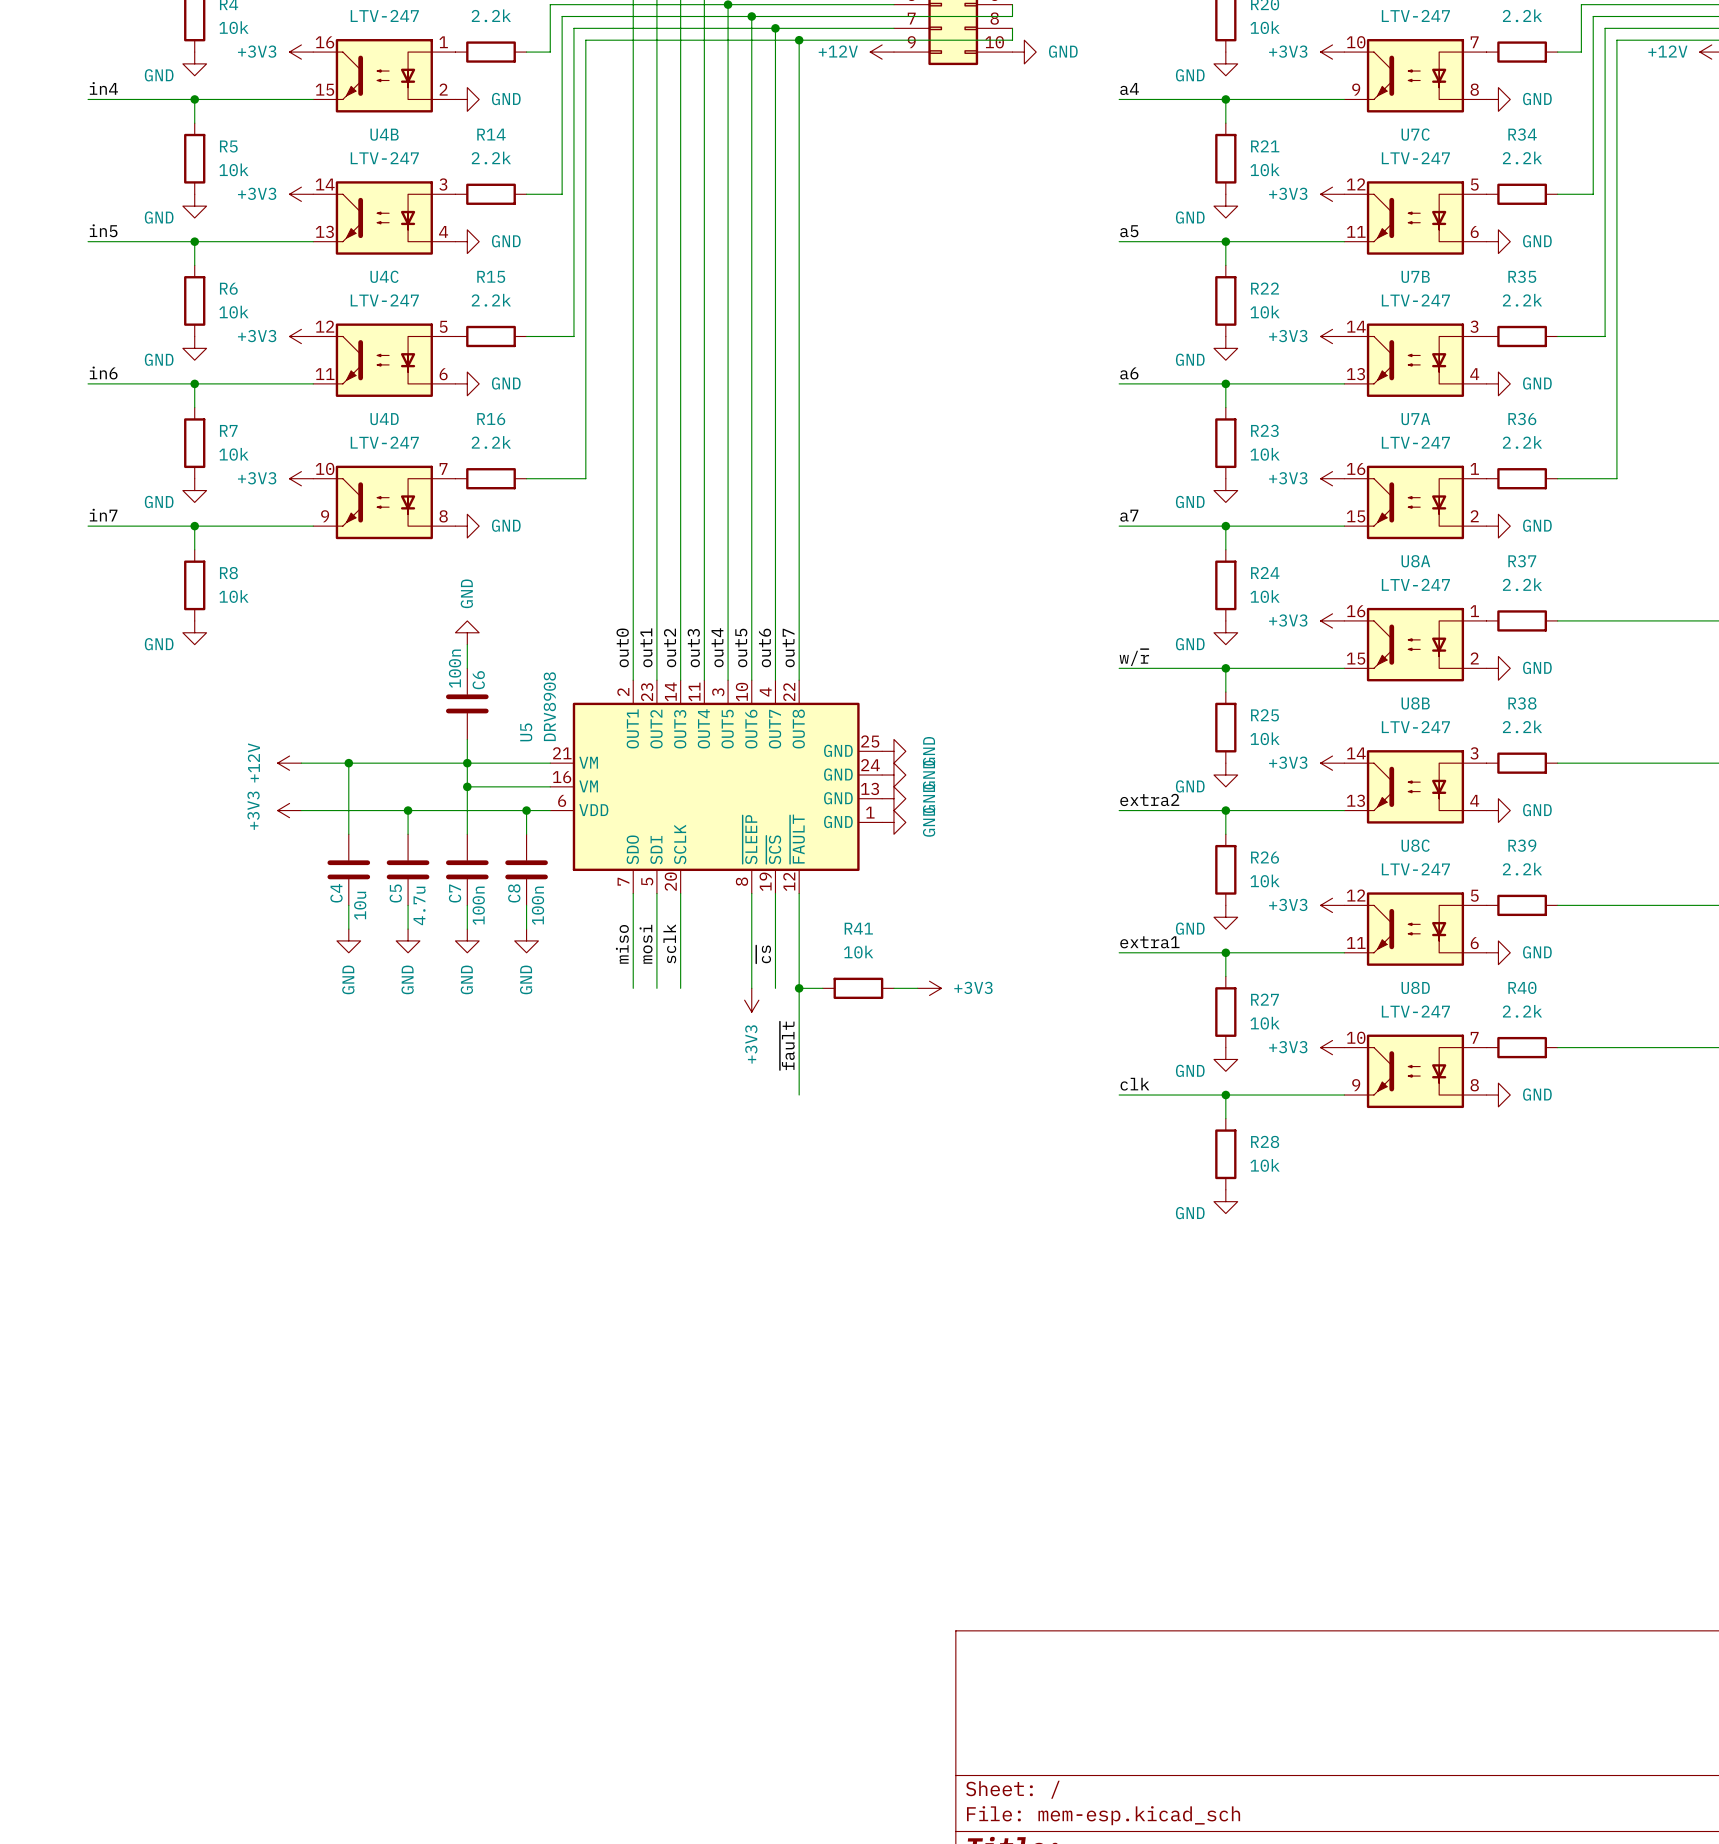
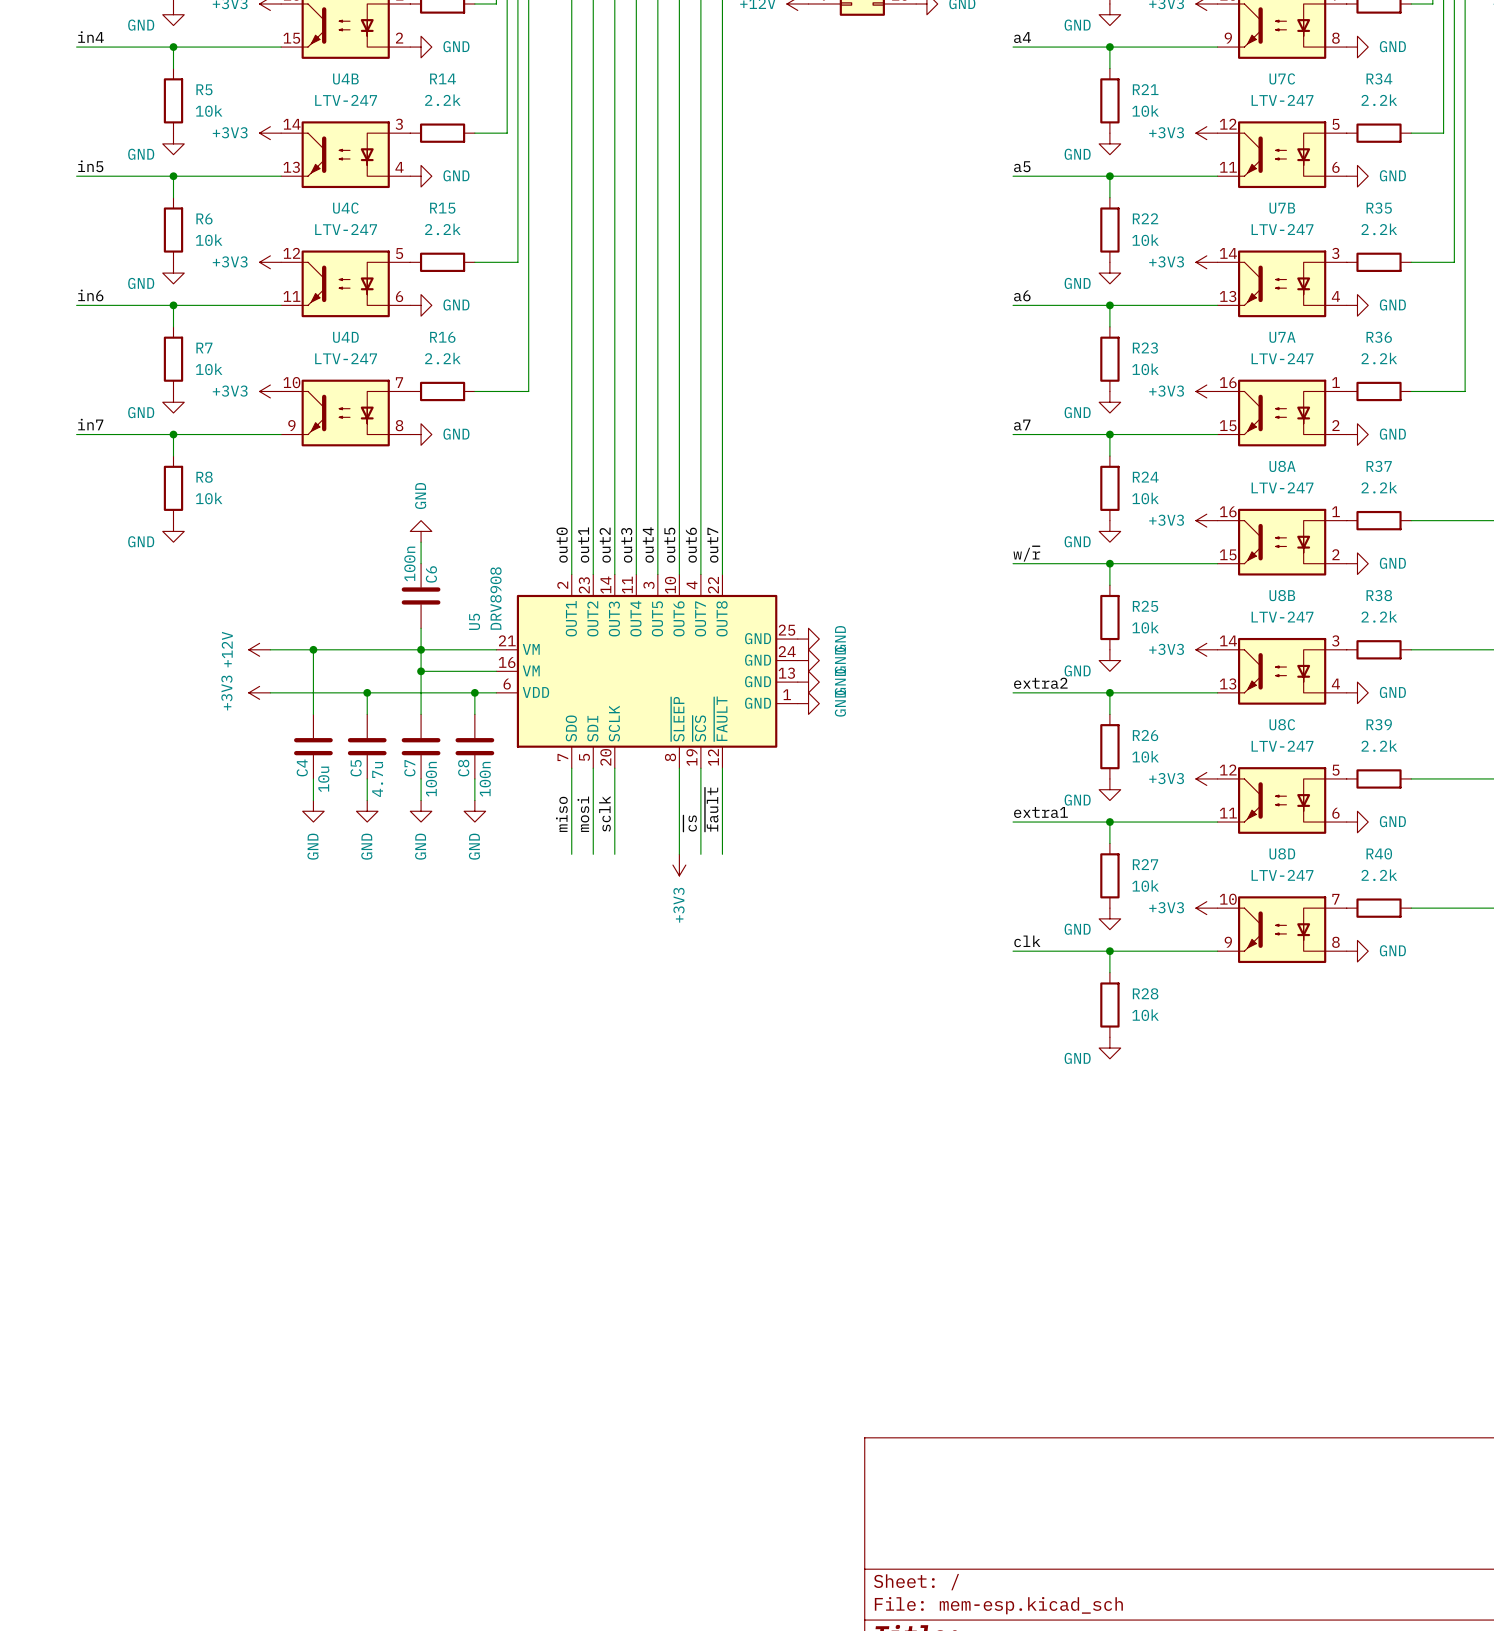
junction: (799, 988) -> none
wire: (822, 988) (799, 988) (799, 1095) -> none
R41: 10k (858, 988) -> none
wire: (893, 988) (917, 988) -> none
power symbol: +3V3 (929, 988) -> none
label position: ~{fault} (787, 1045) -> ~{fault} (711, 809)

